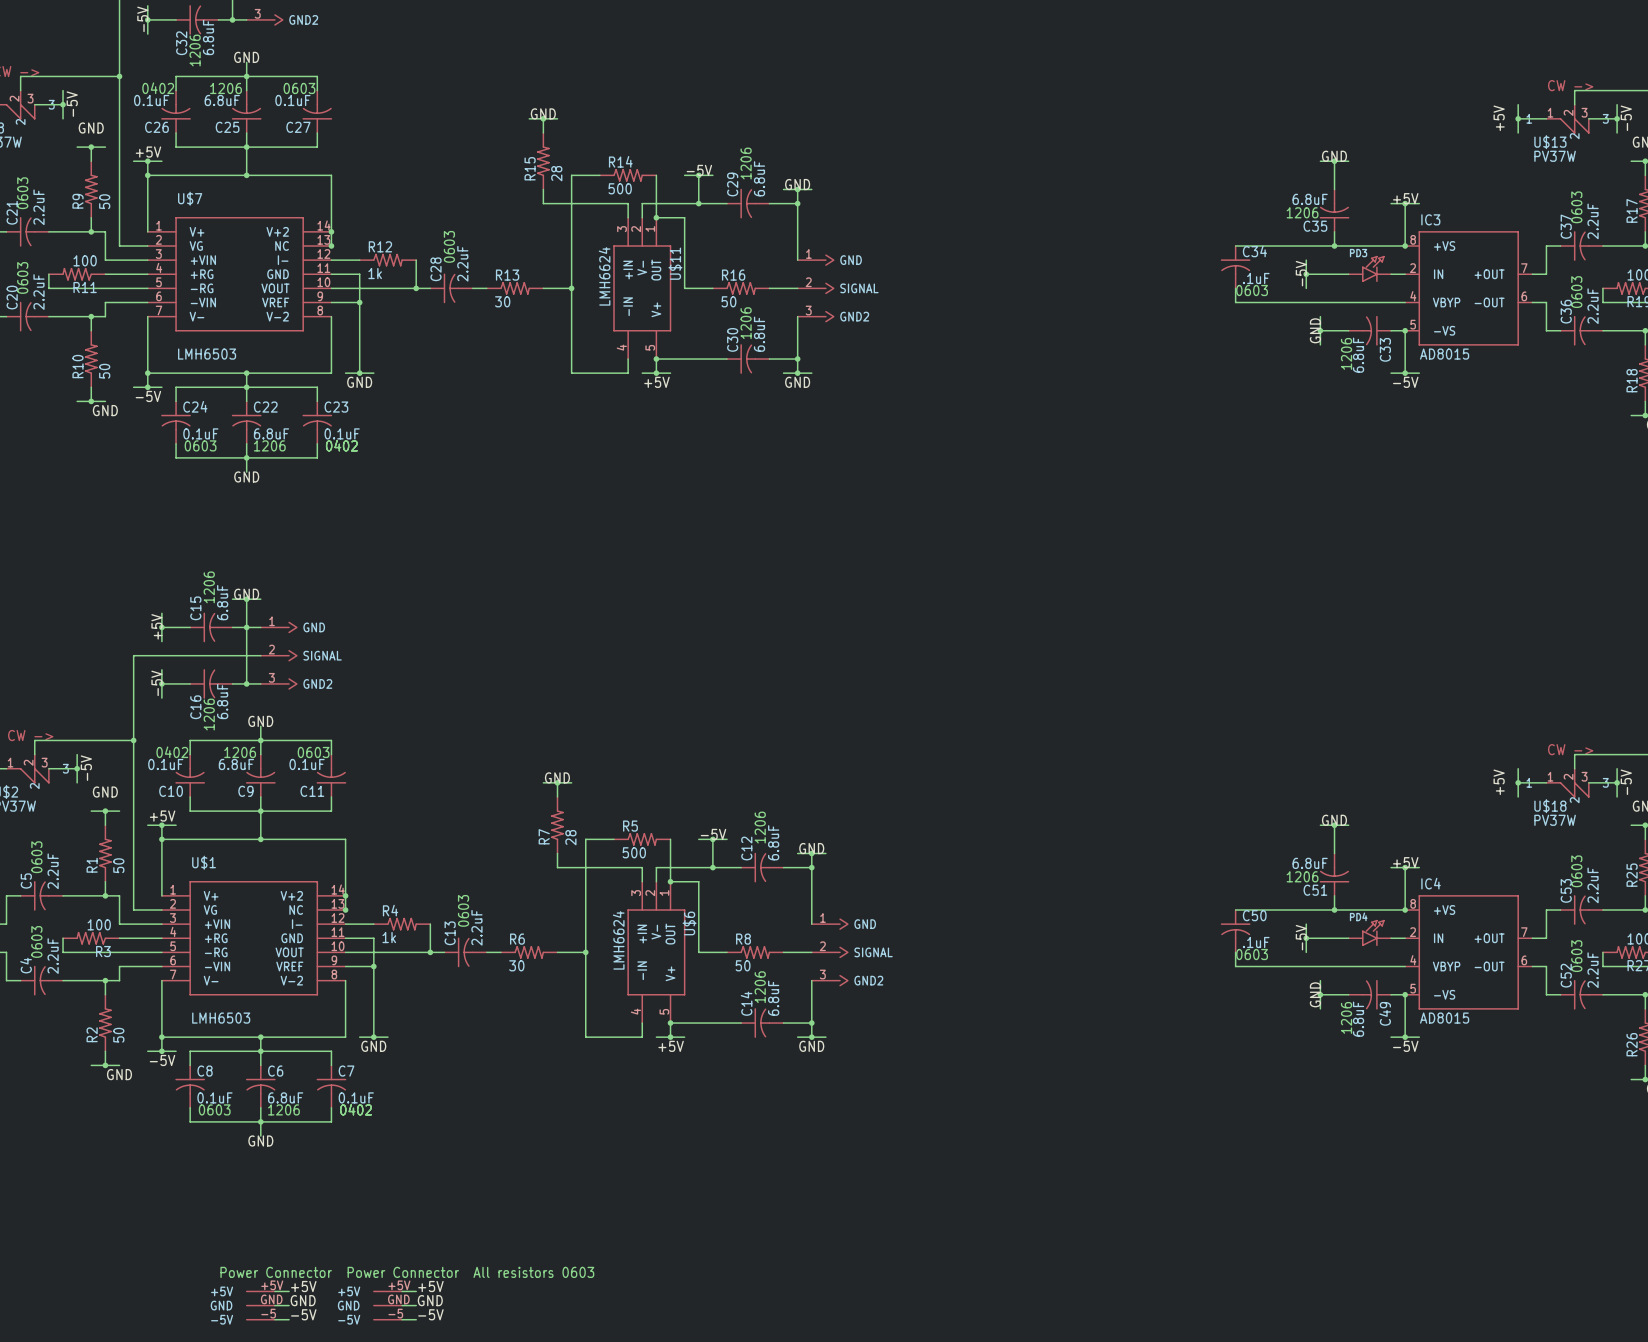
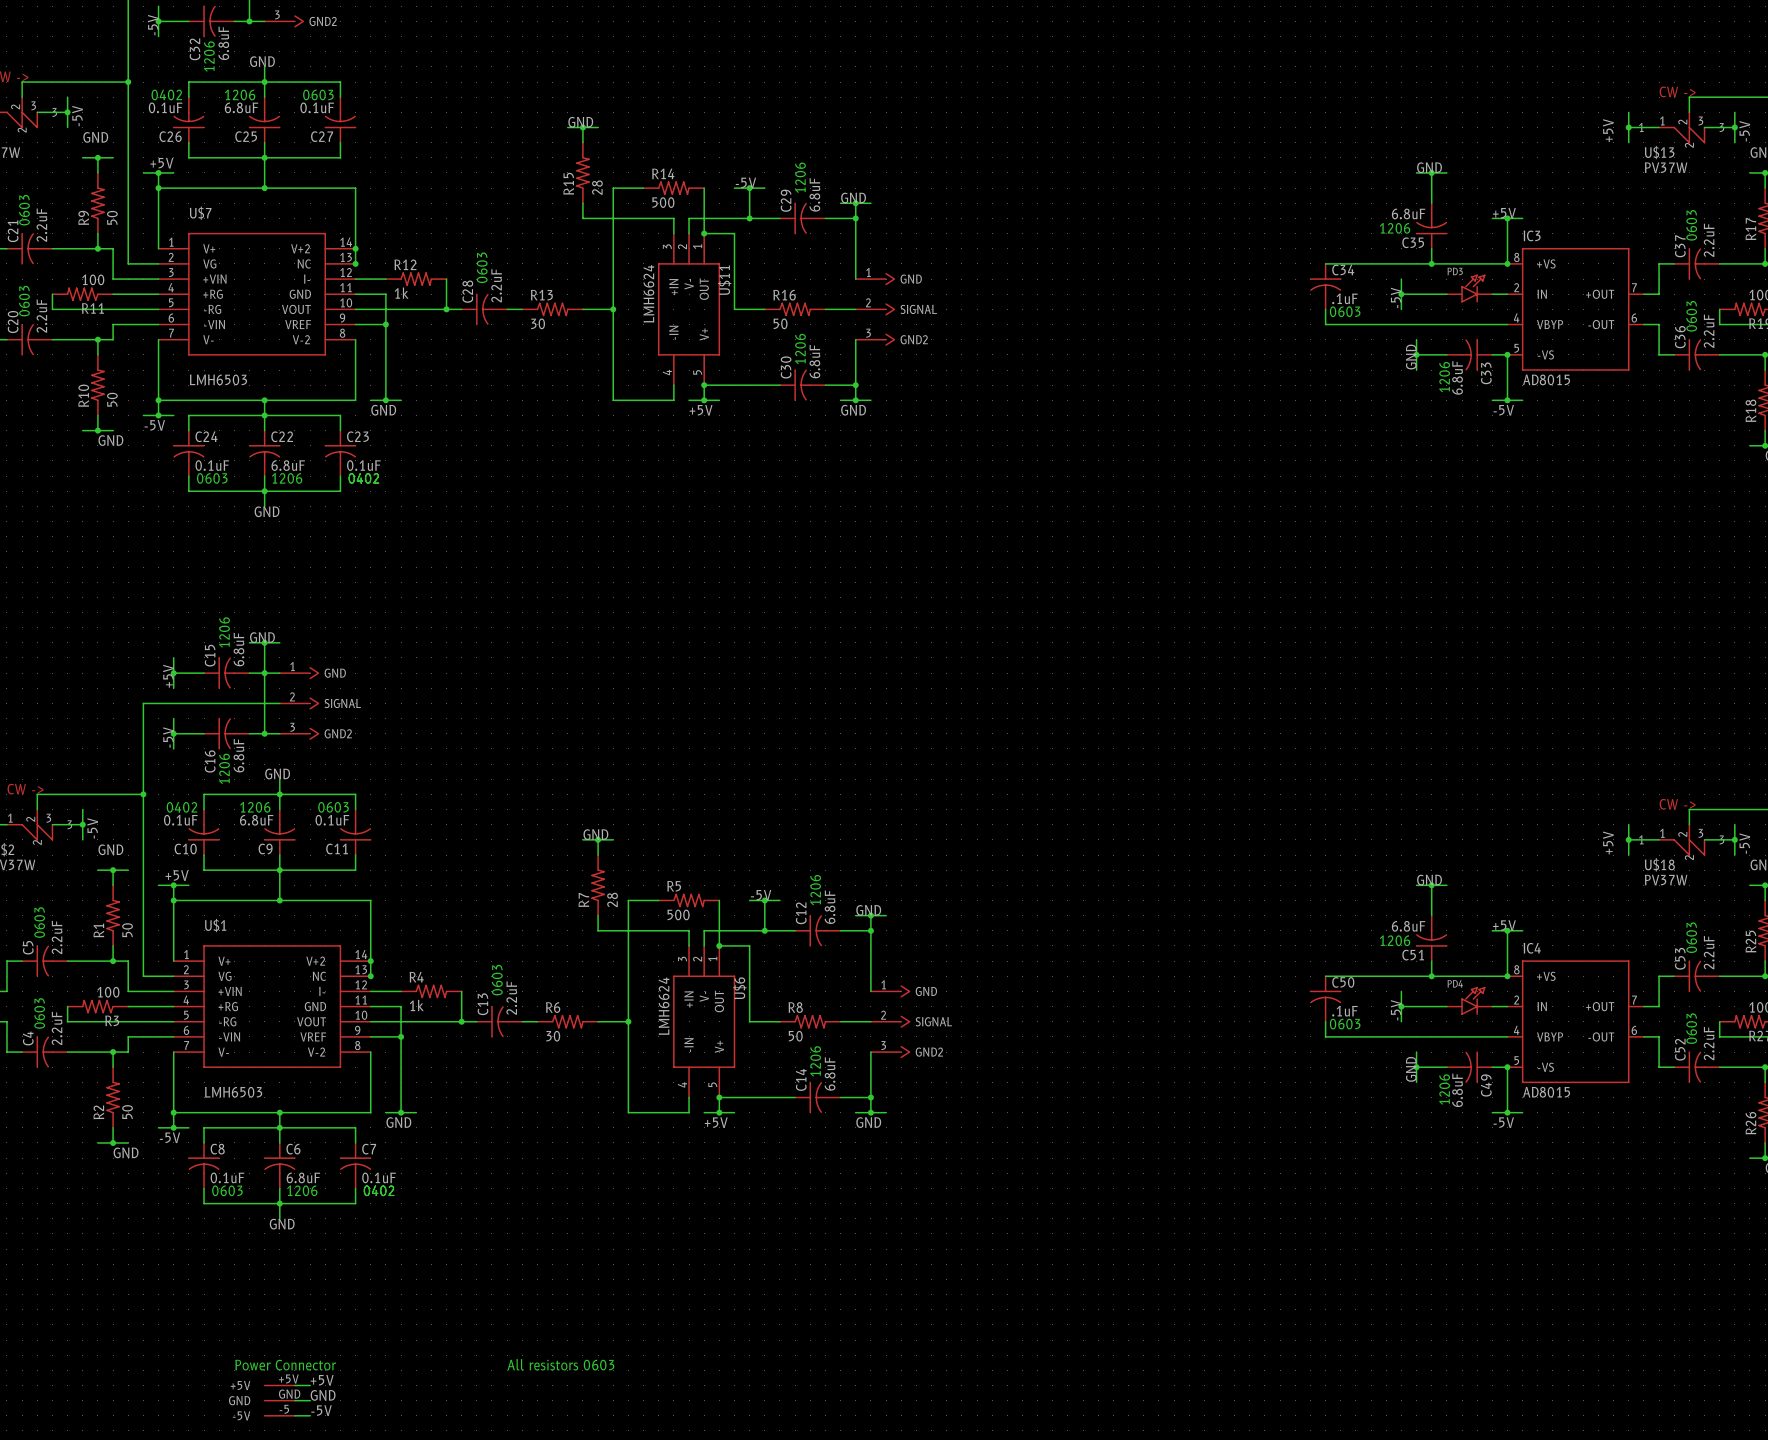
text: Power Connector (403, 1272) -> none
label: +5V (430, 1286) -> none
wire: (402, 1291) (416, 1291) -> none
label: GND (430, 1300) -> none
part: (387, 1305) -> none
wire: (402, 1305) (416, 1305) -> none
label: -5V (430, 1314) -> none
wire: (402, 1319) (416, 1319) -> none

